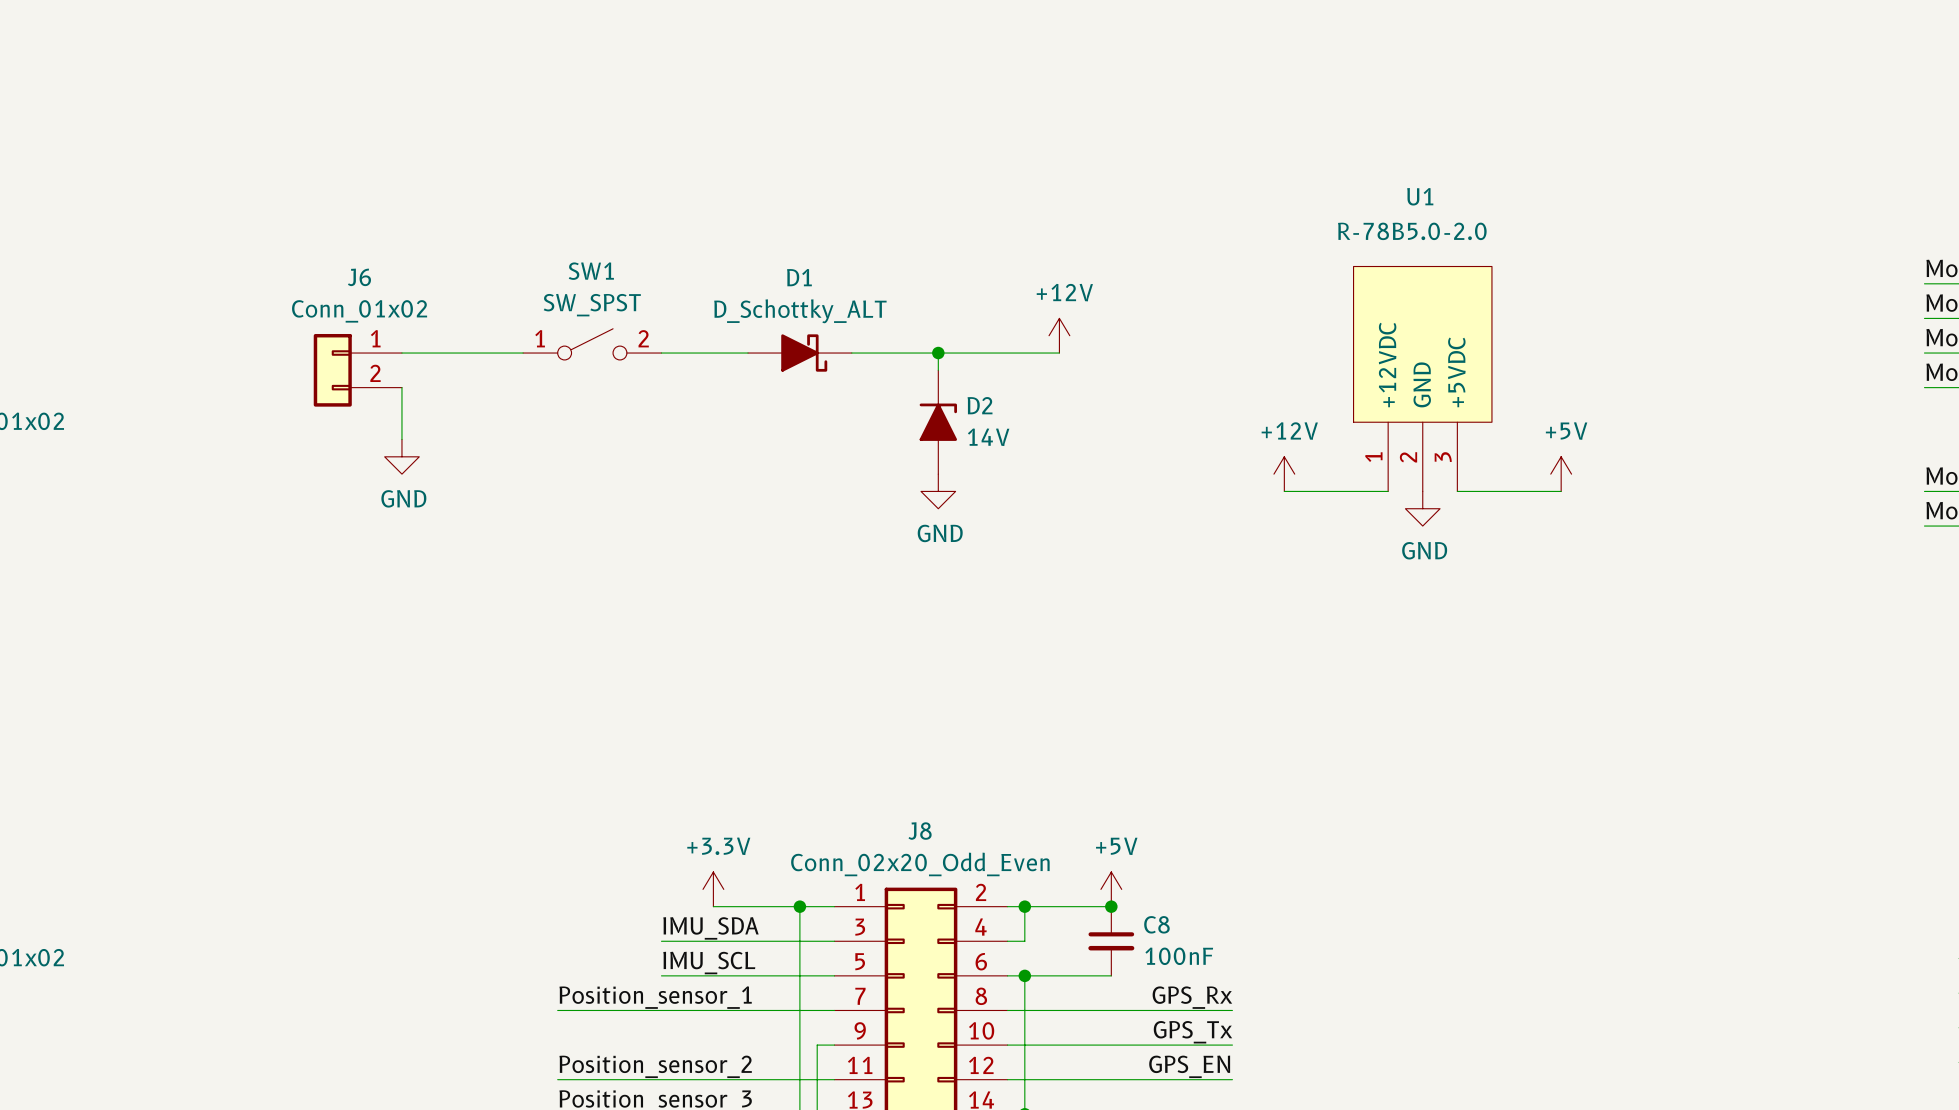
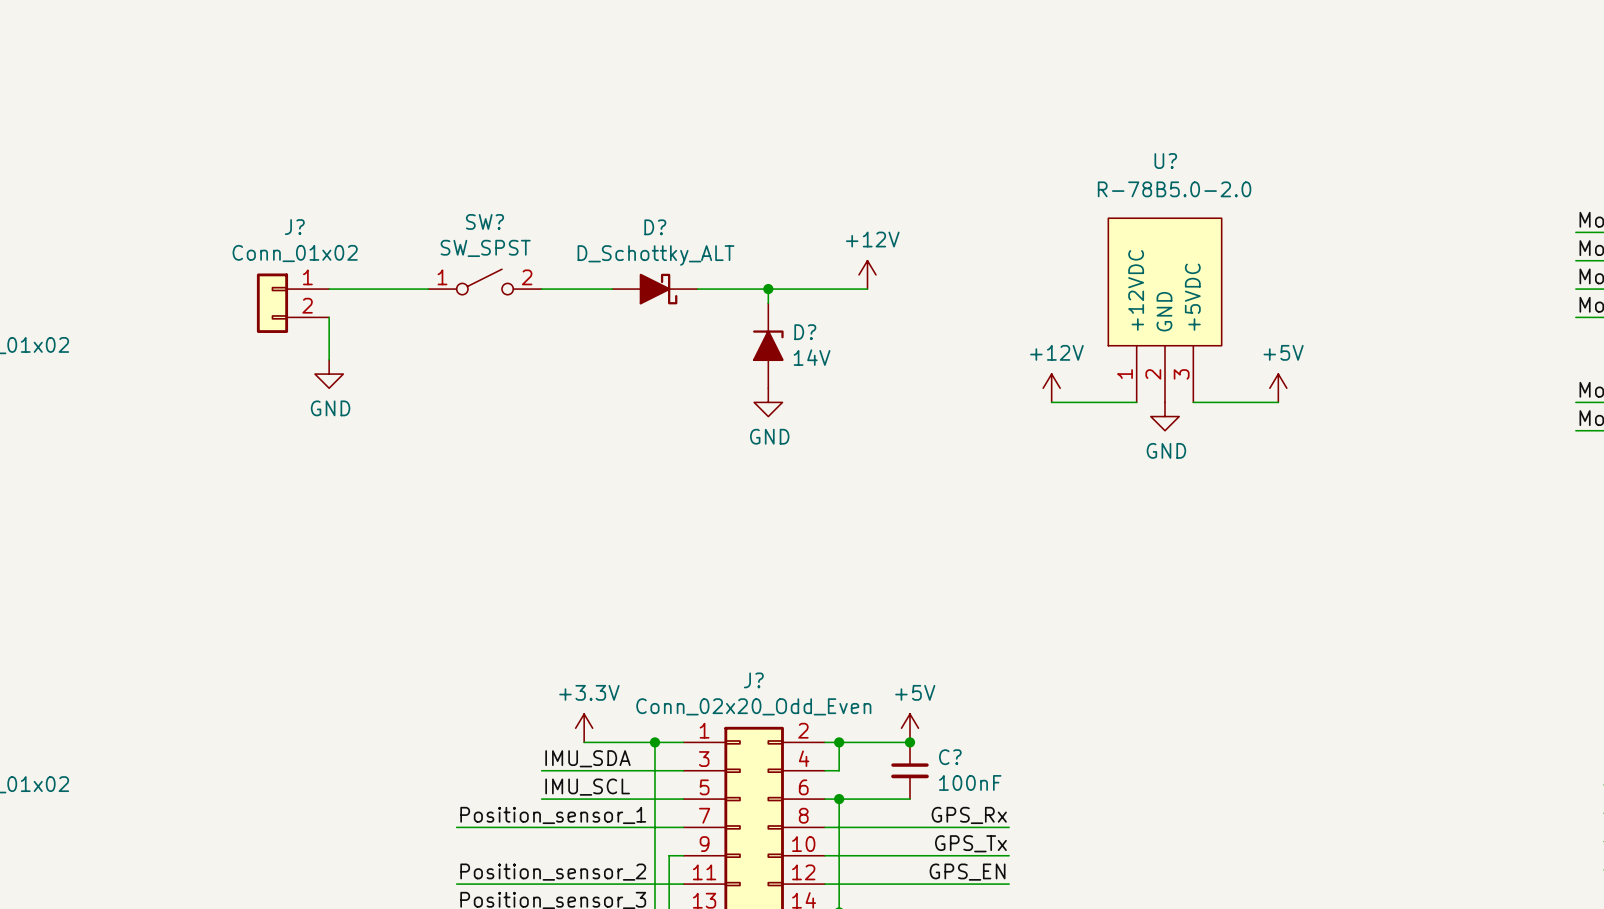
U1 name: U1 (1420, 196) -> U? (1165, 161)
SW1 name: SW1 (591, 271) -> SW? (484, 221)
J6 name: J6 (359, 277) -> J? (294, 227)
D1 name: D1 (799, 277) -> D? (655, 227)
D2 name: D2 (980, 405) -> D? (805, 332)
J8 name: J8 (920, 831) -> J? (753, 680)
C8 name: C8 (1156, 924) -> C? (950, 757)

